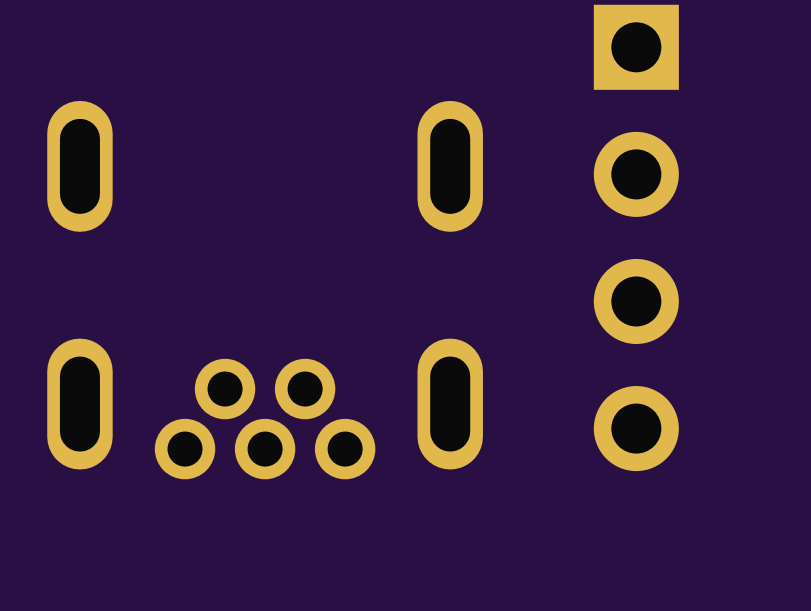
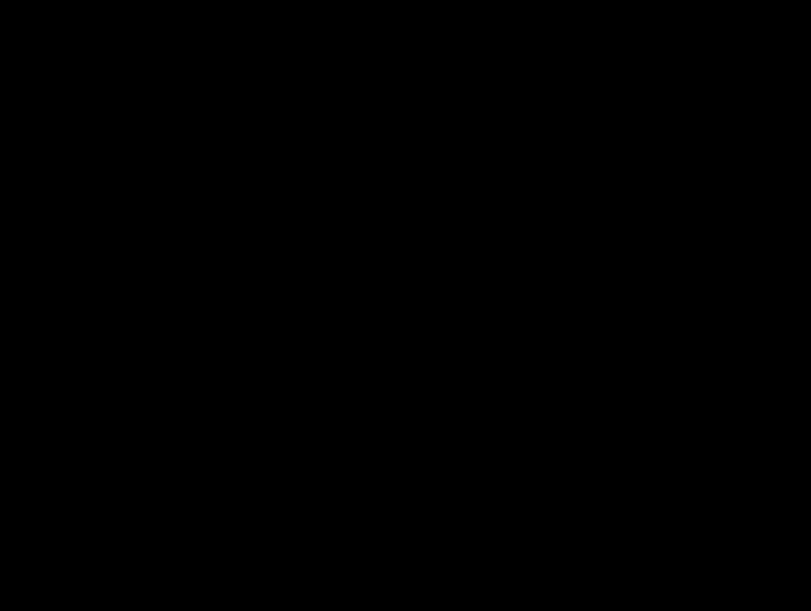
part: (636, 237) -> none
part: (265, 290) -> none

